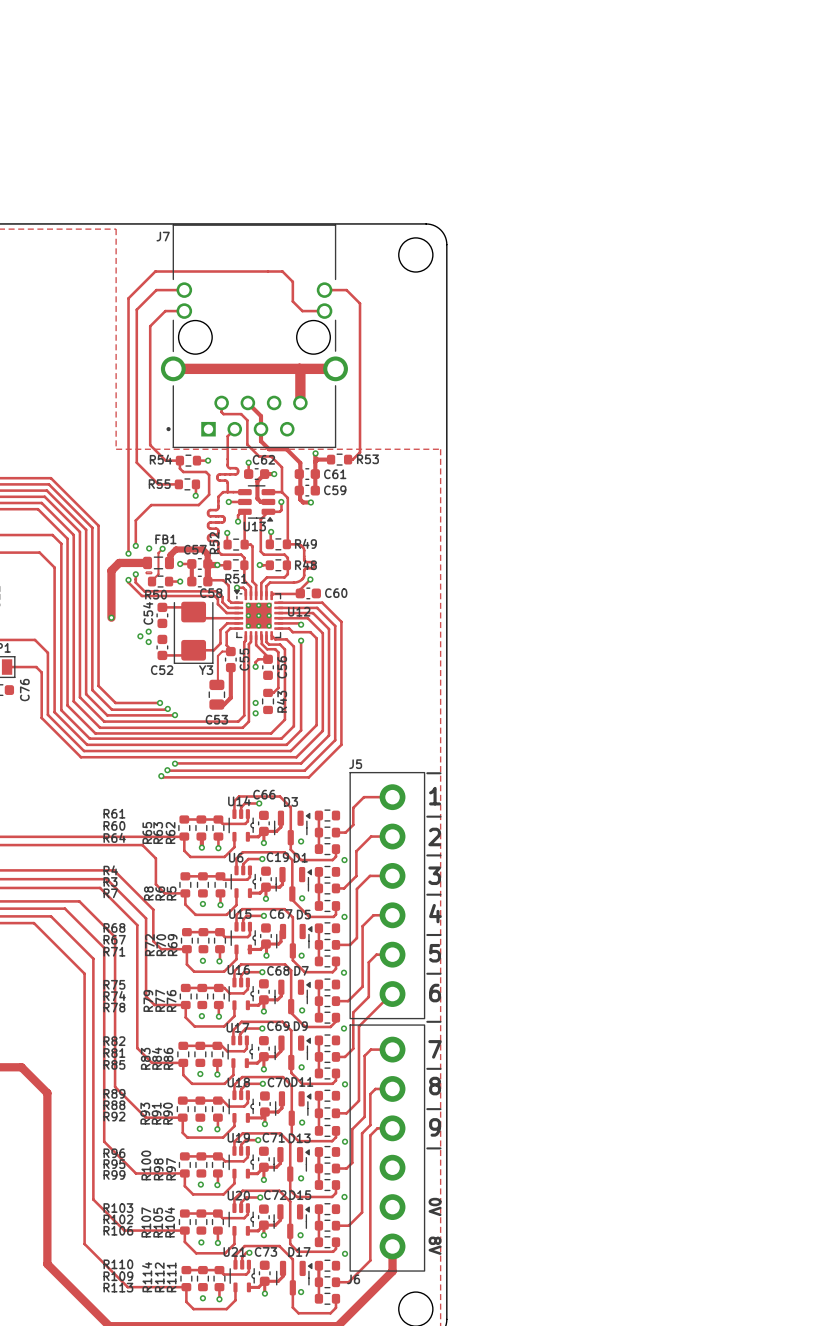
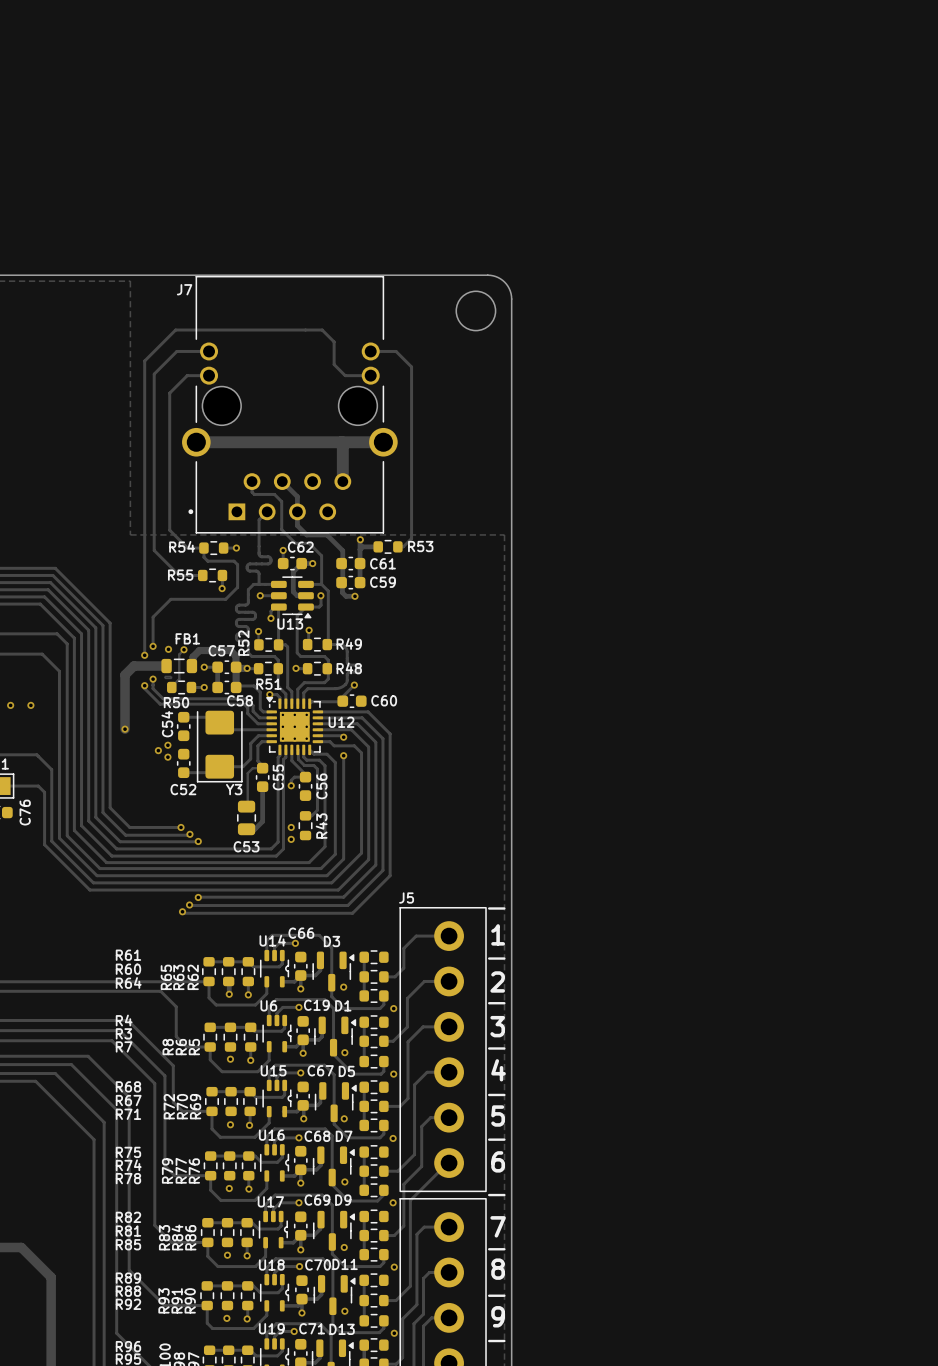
via: none -> (10, 705)
via: none -> (30, 705)

